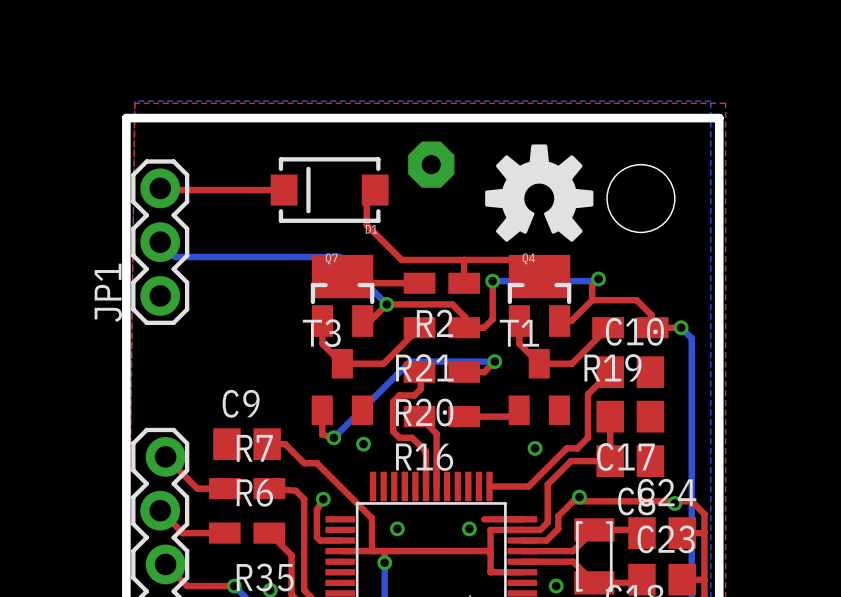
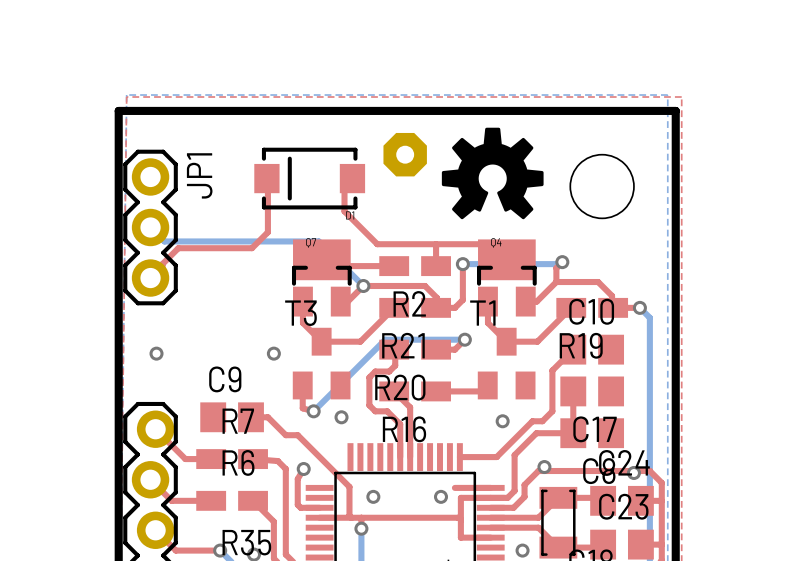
top track: (160, 188) (161, 190) (284, 190) -> (154, 277) (162, 269) (162, 264) (178, 248) (252, 248) (267, 232) (266, 178)
drawing position: (539, 193) -> (492, 173)
JP1 name position: JP1 (108, 292) -> JP1 (199, 175)
via: none -> (156, 353)
via: none -> (273, 353)

